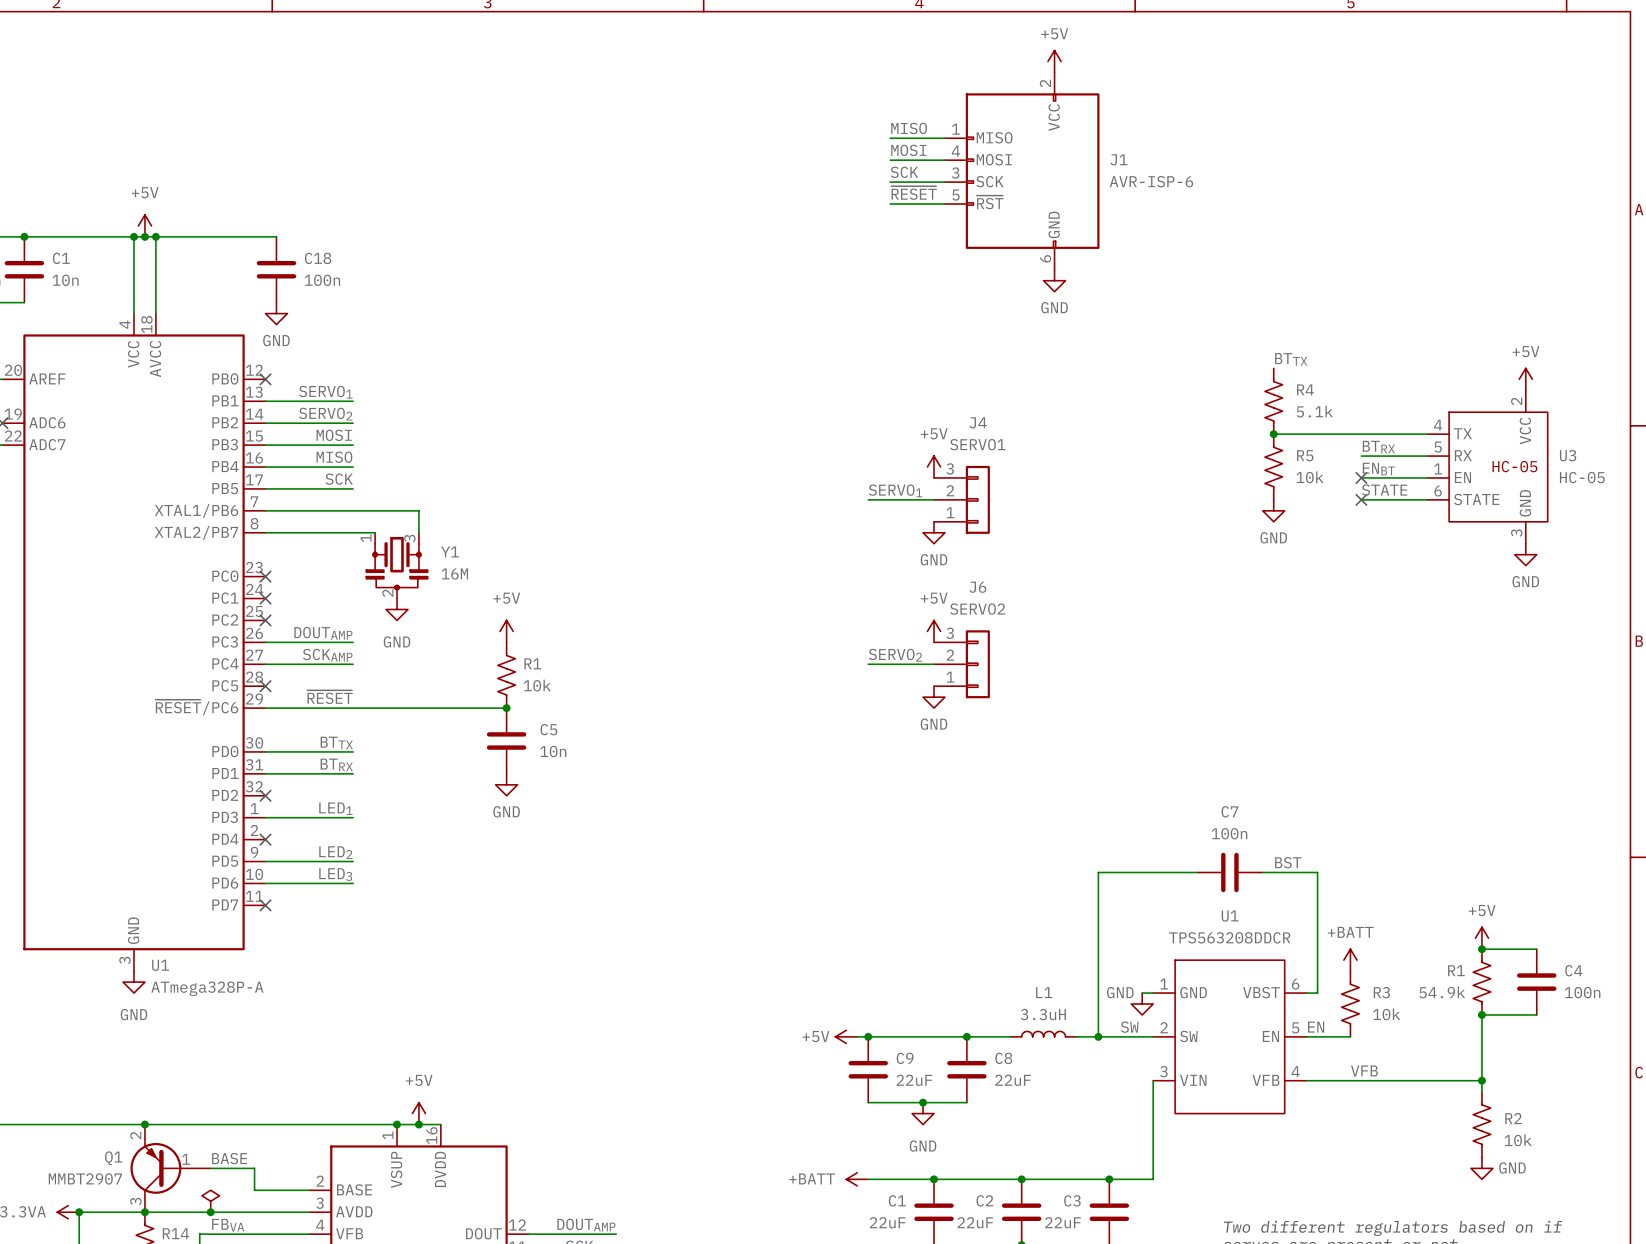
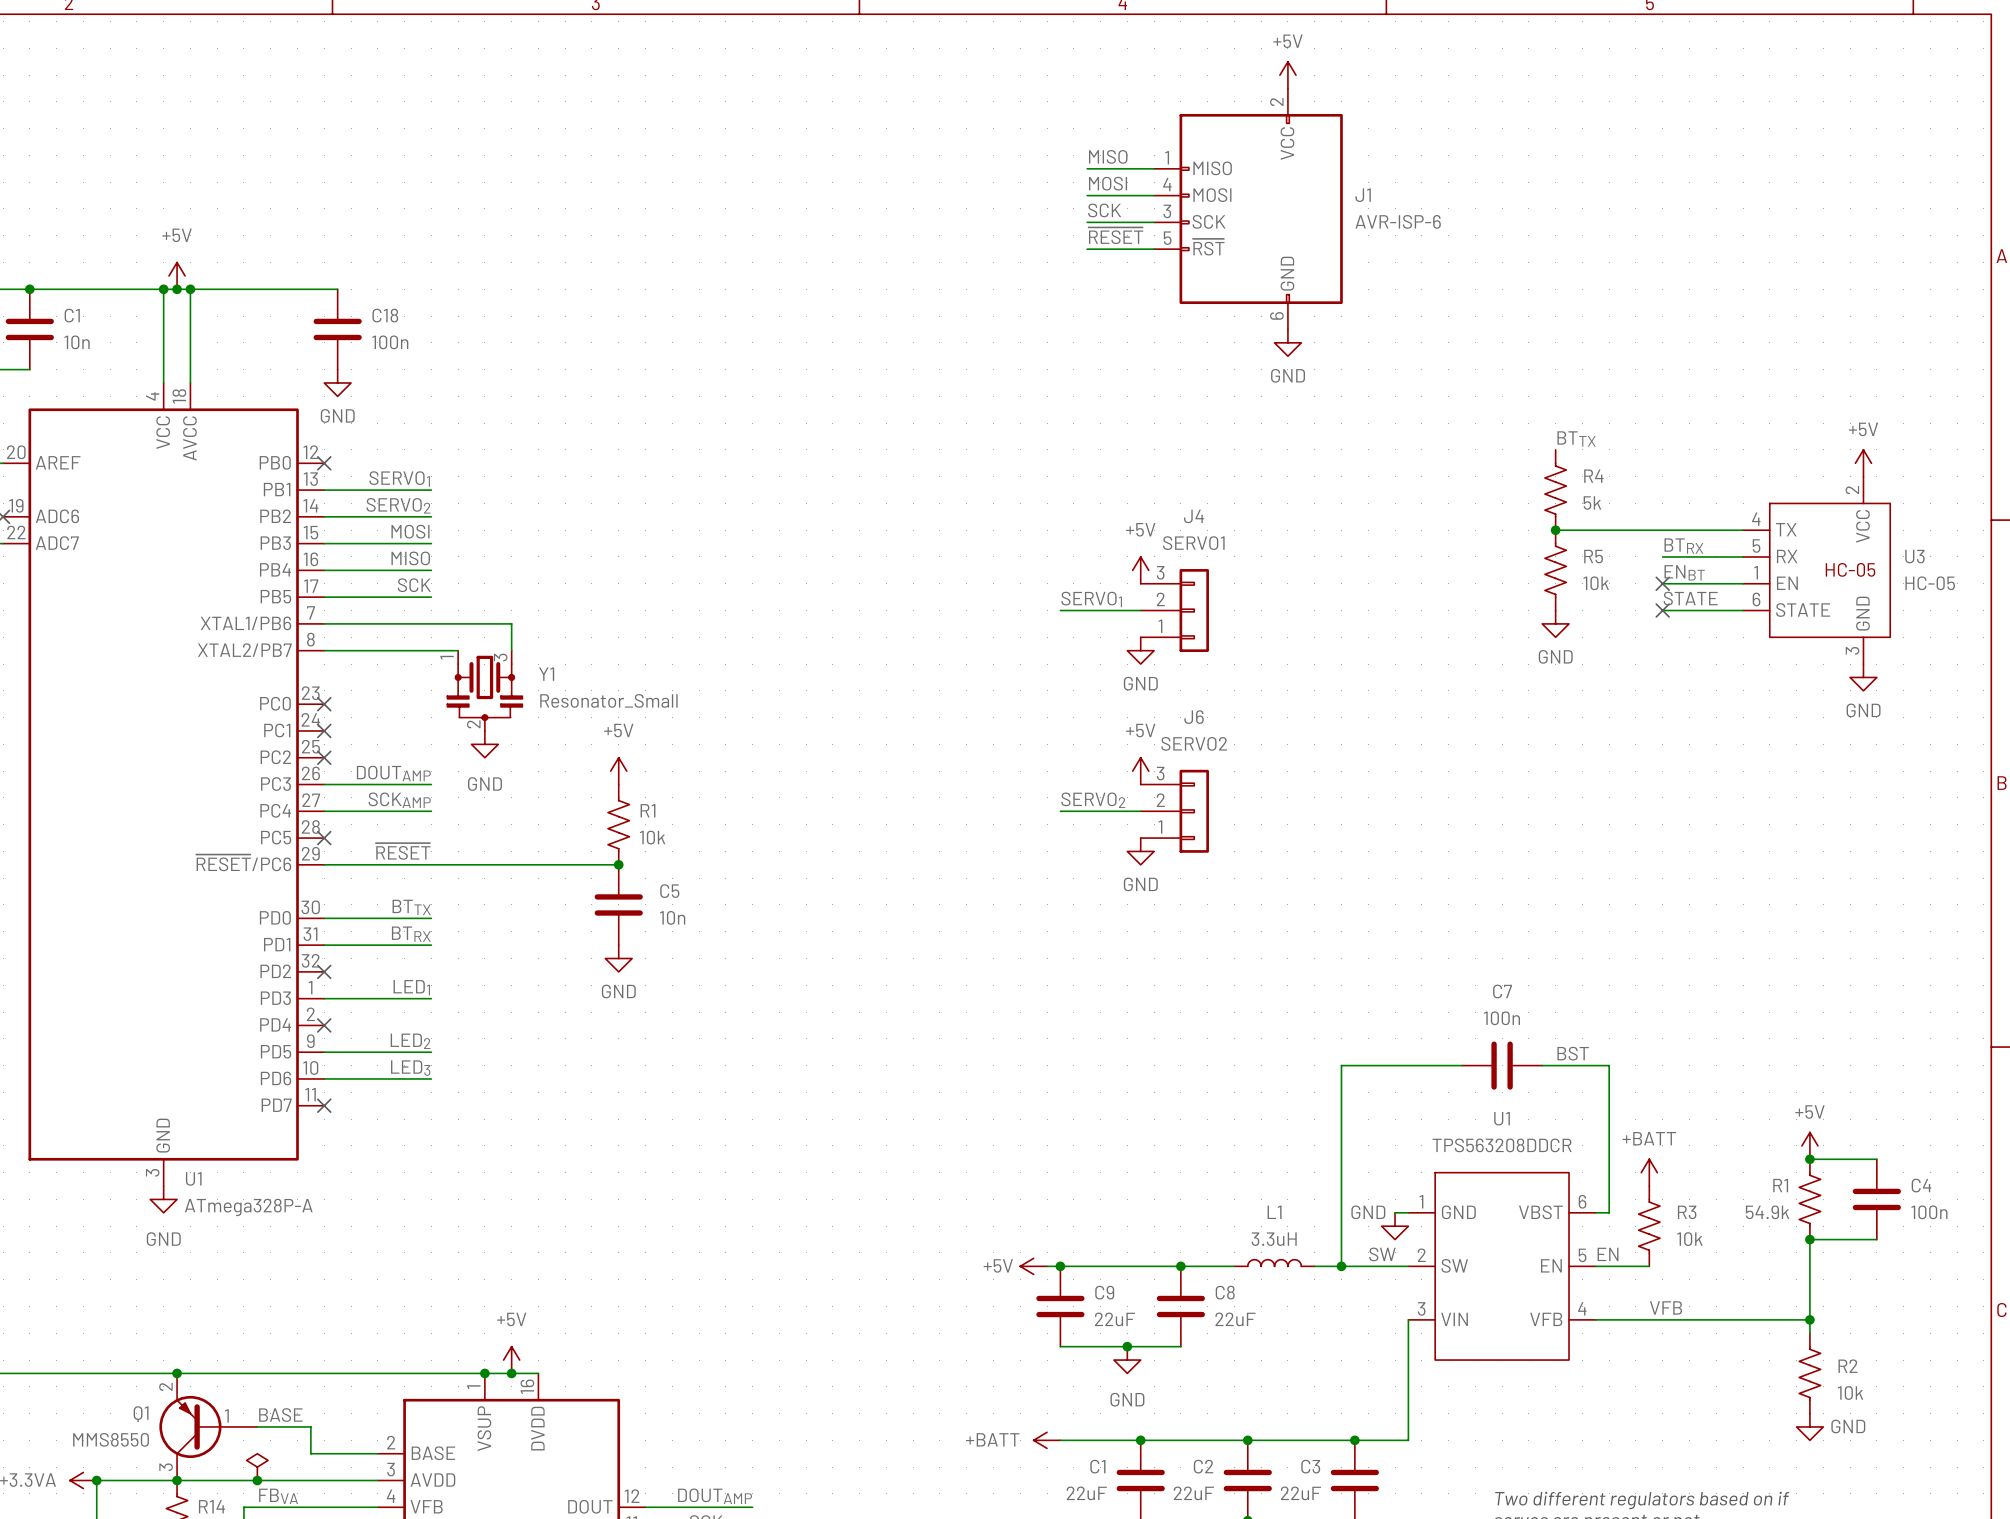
R4 value: 5.1k (1314, 411) -> 5k (1592, 503)
Y1 value: 16M (454, 573) -> Resonator_Small (608, 700)
Q1 value: MMBT2907 (85, 1178) -> MMS8550 (111, 1439)

